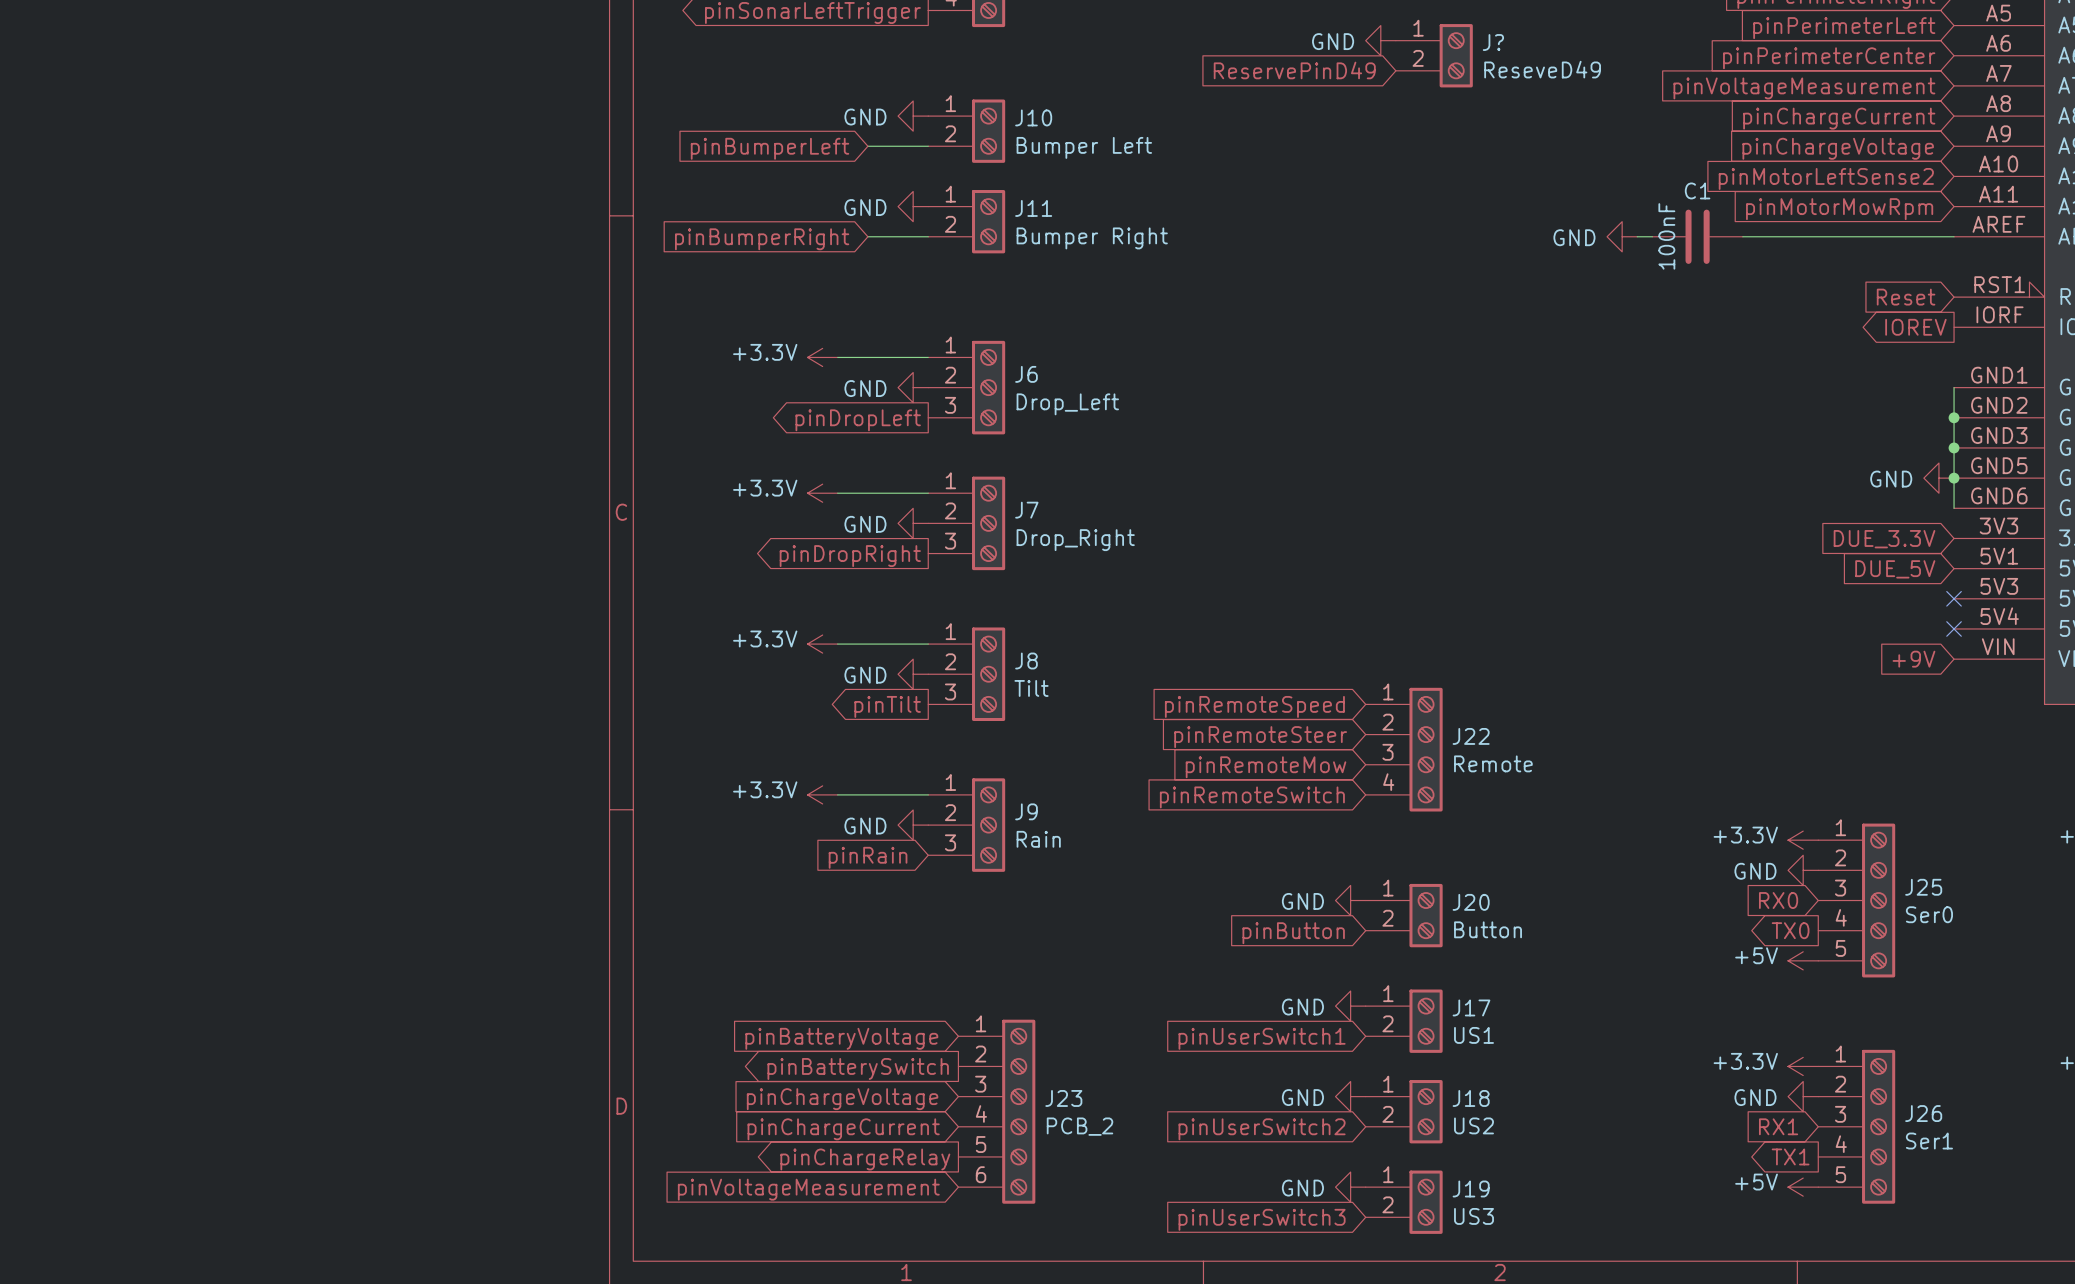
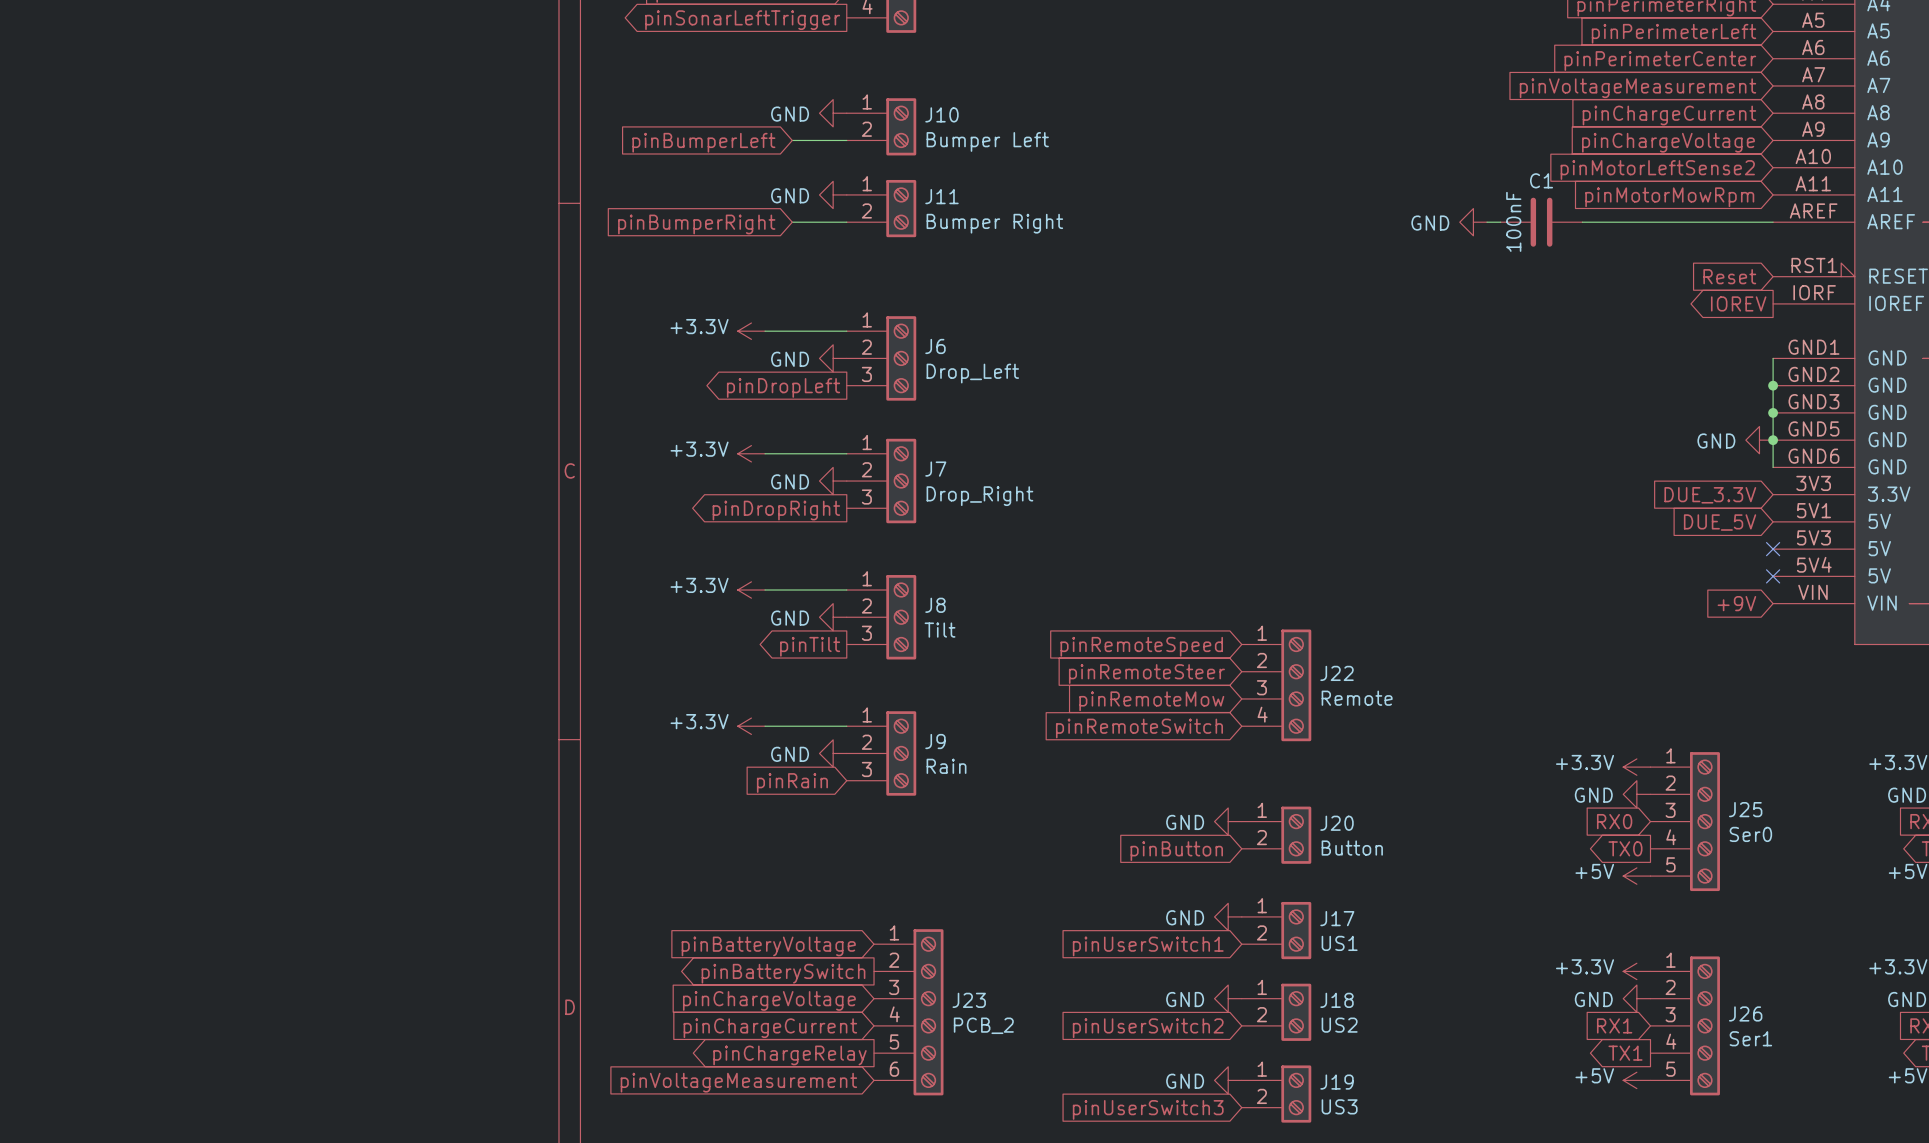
power symbol: GND (1380, 40) -> none
J?: ReseveD49 (1434, 55) -> none
global label: ReservePinD49 (1294, 70) -> none

